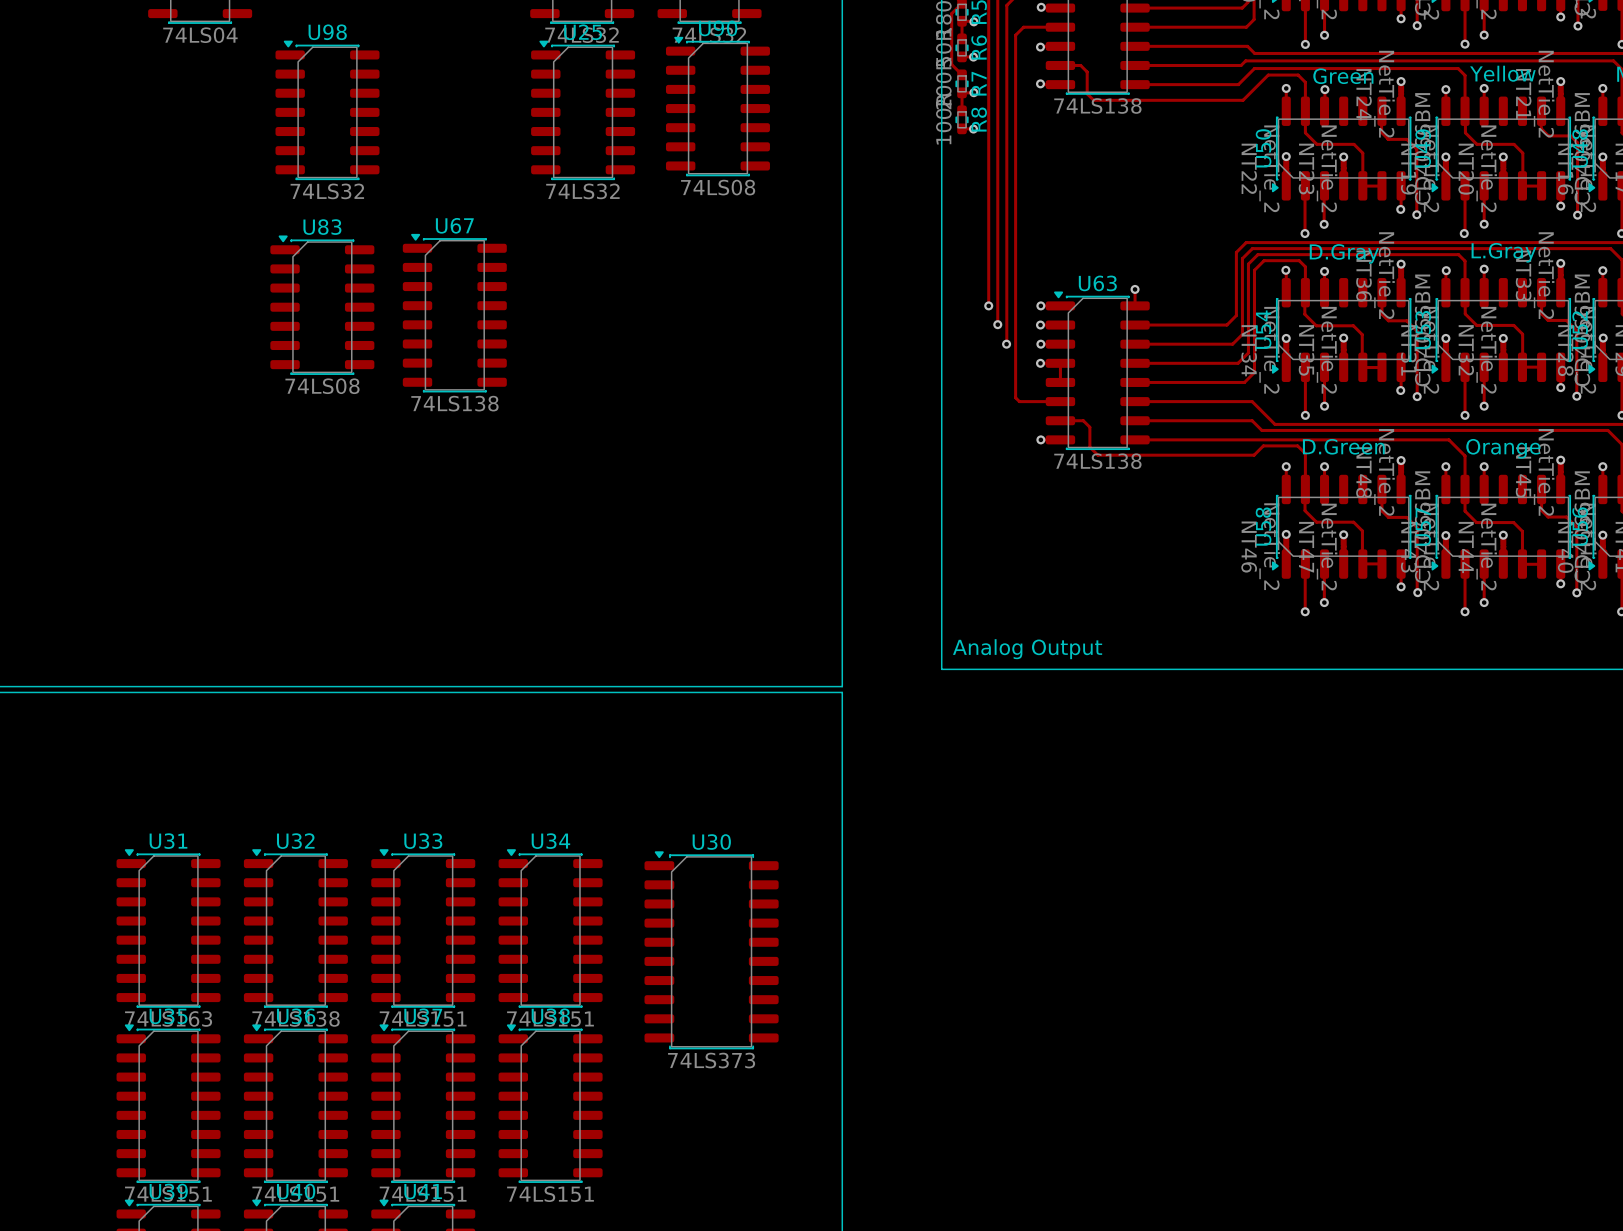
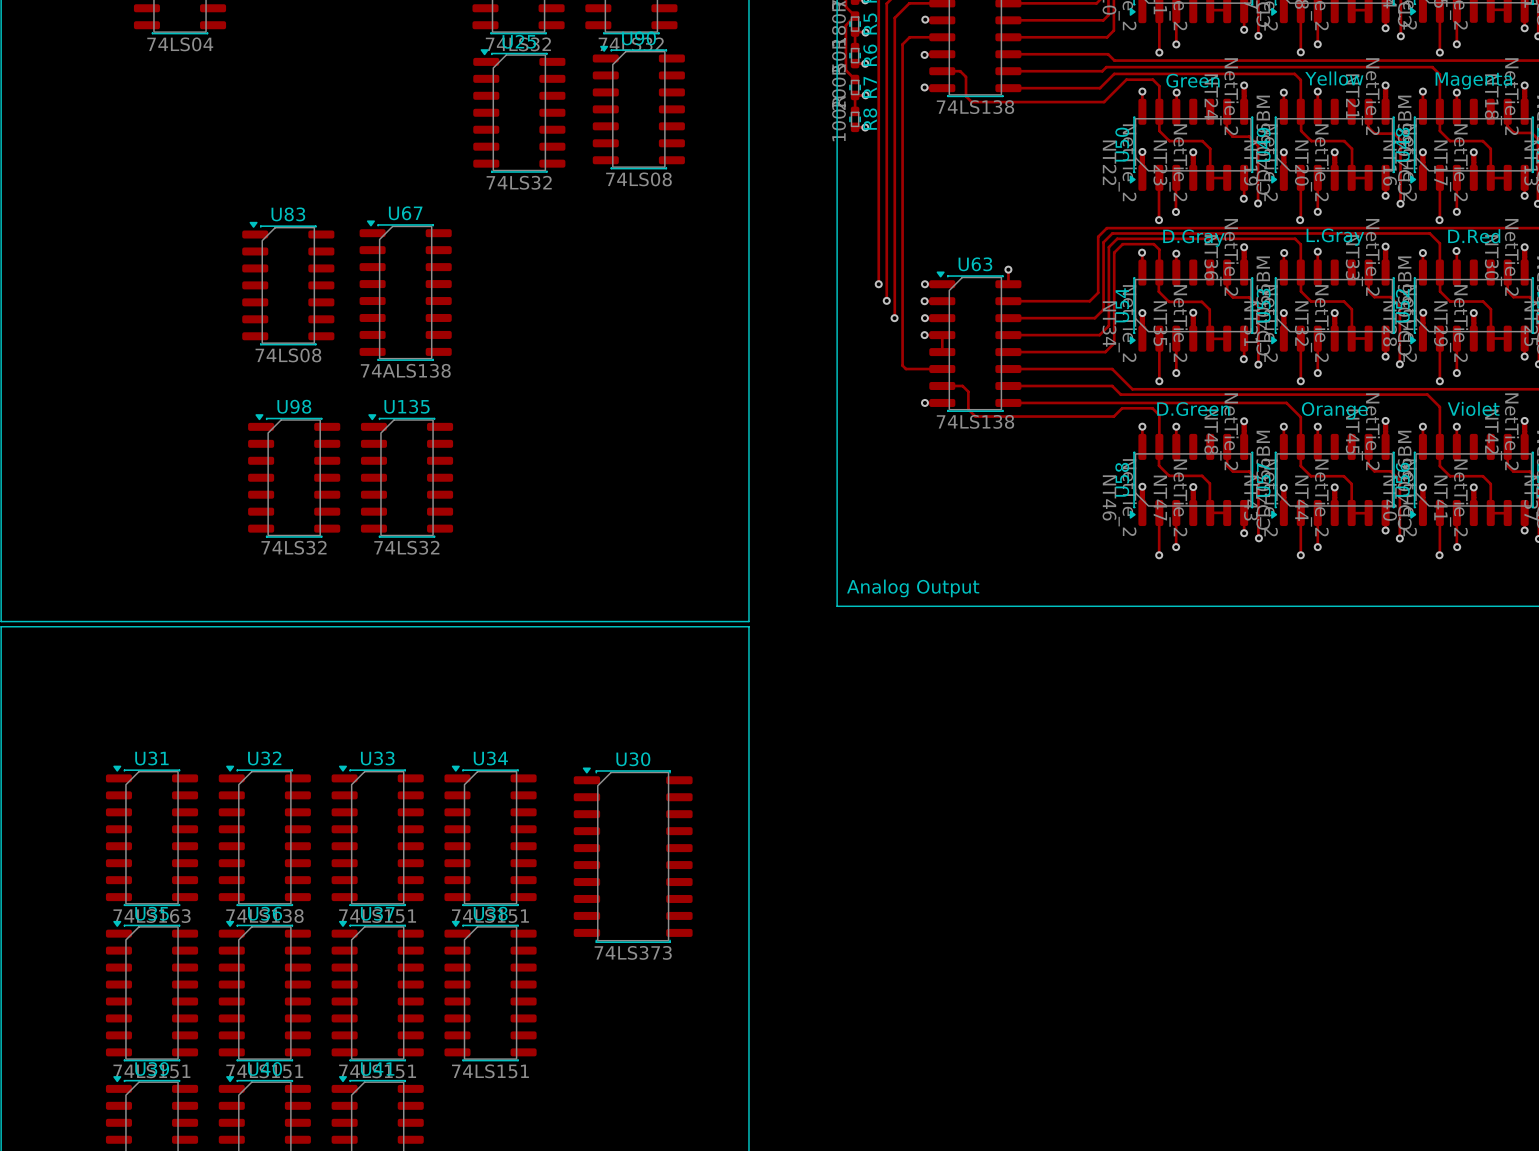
U98 position: (327, 110) -> (294, 475)
U67 value: 74LS138 (454, 403) -> 74ALS138 (405, 370)
U135: none -> 74LS32 (407, 475)

